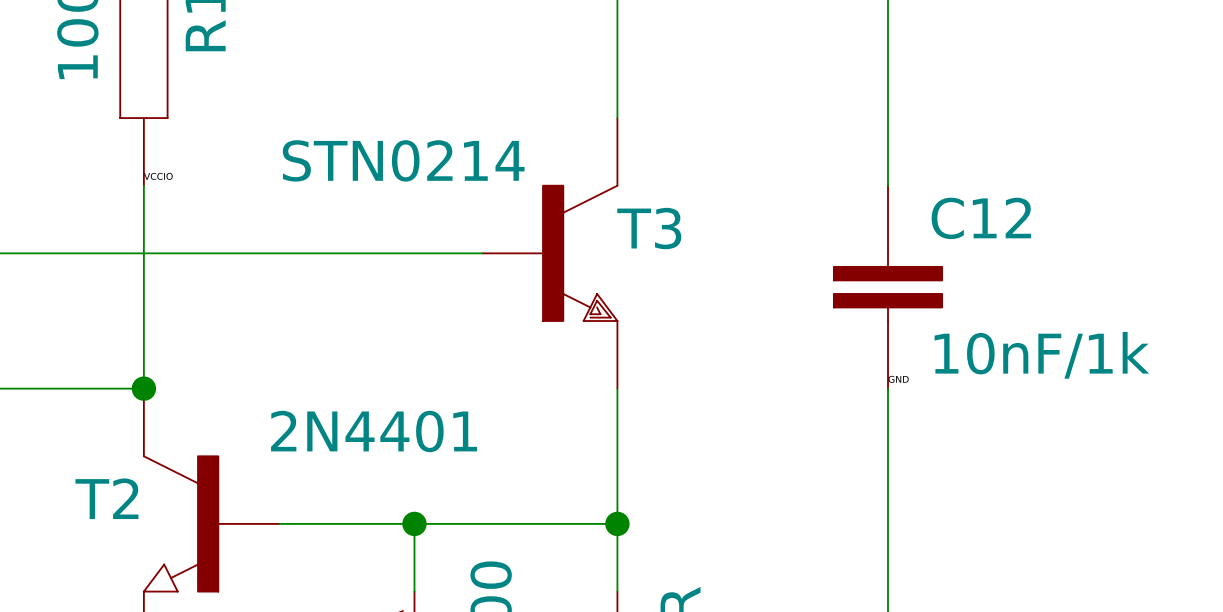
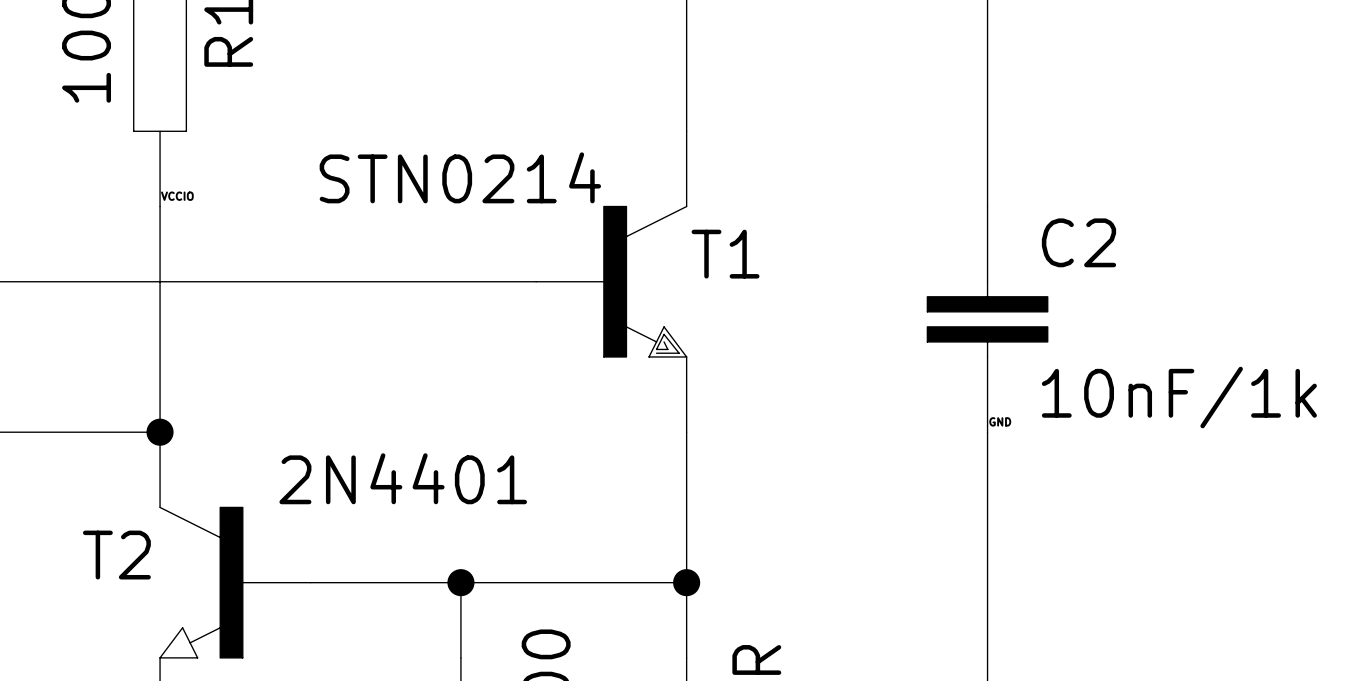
C12 name: C12 (981, 218) -> C2 (1078, 242)
T3 name: T3 (649, 228) -> T1 (725, 254)

